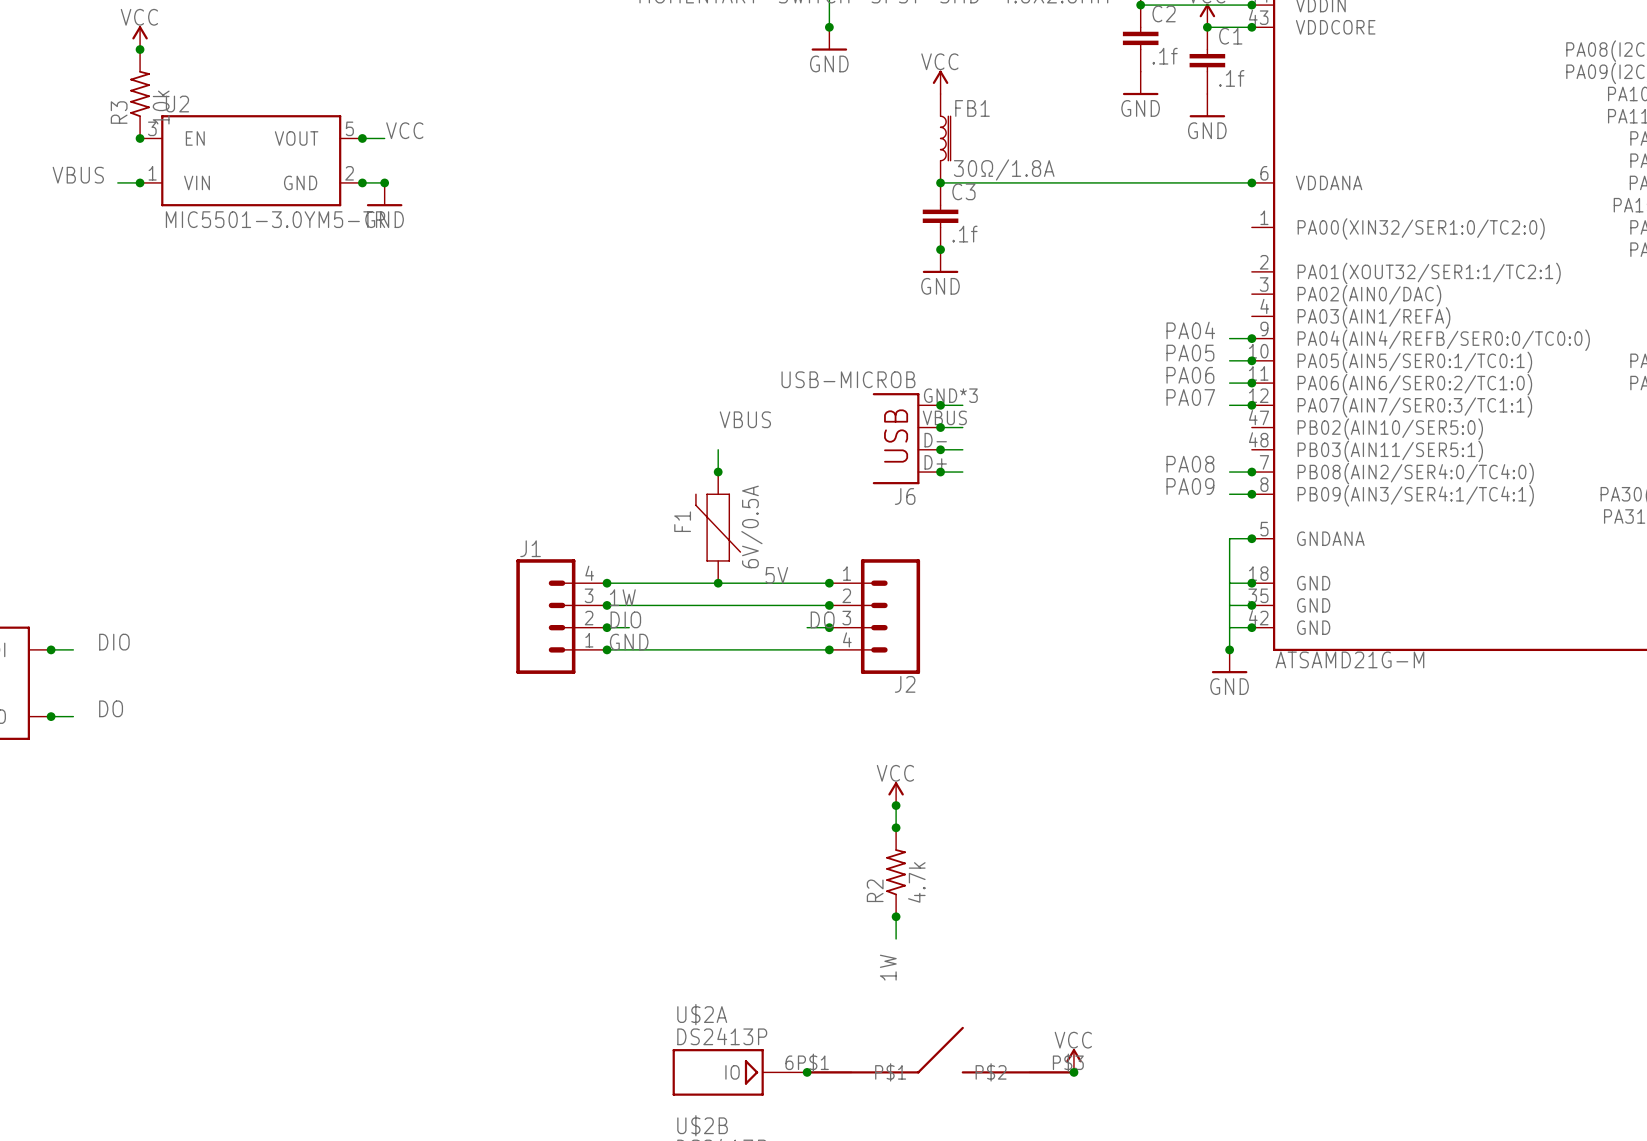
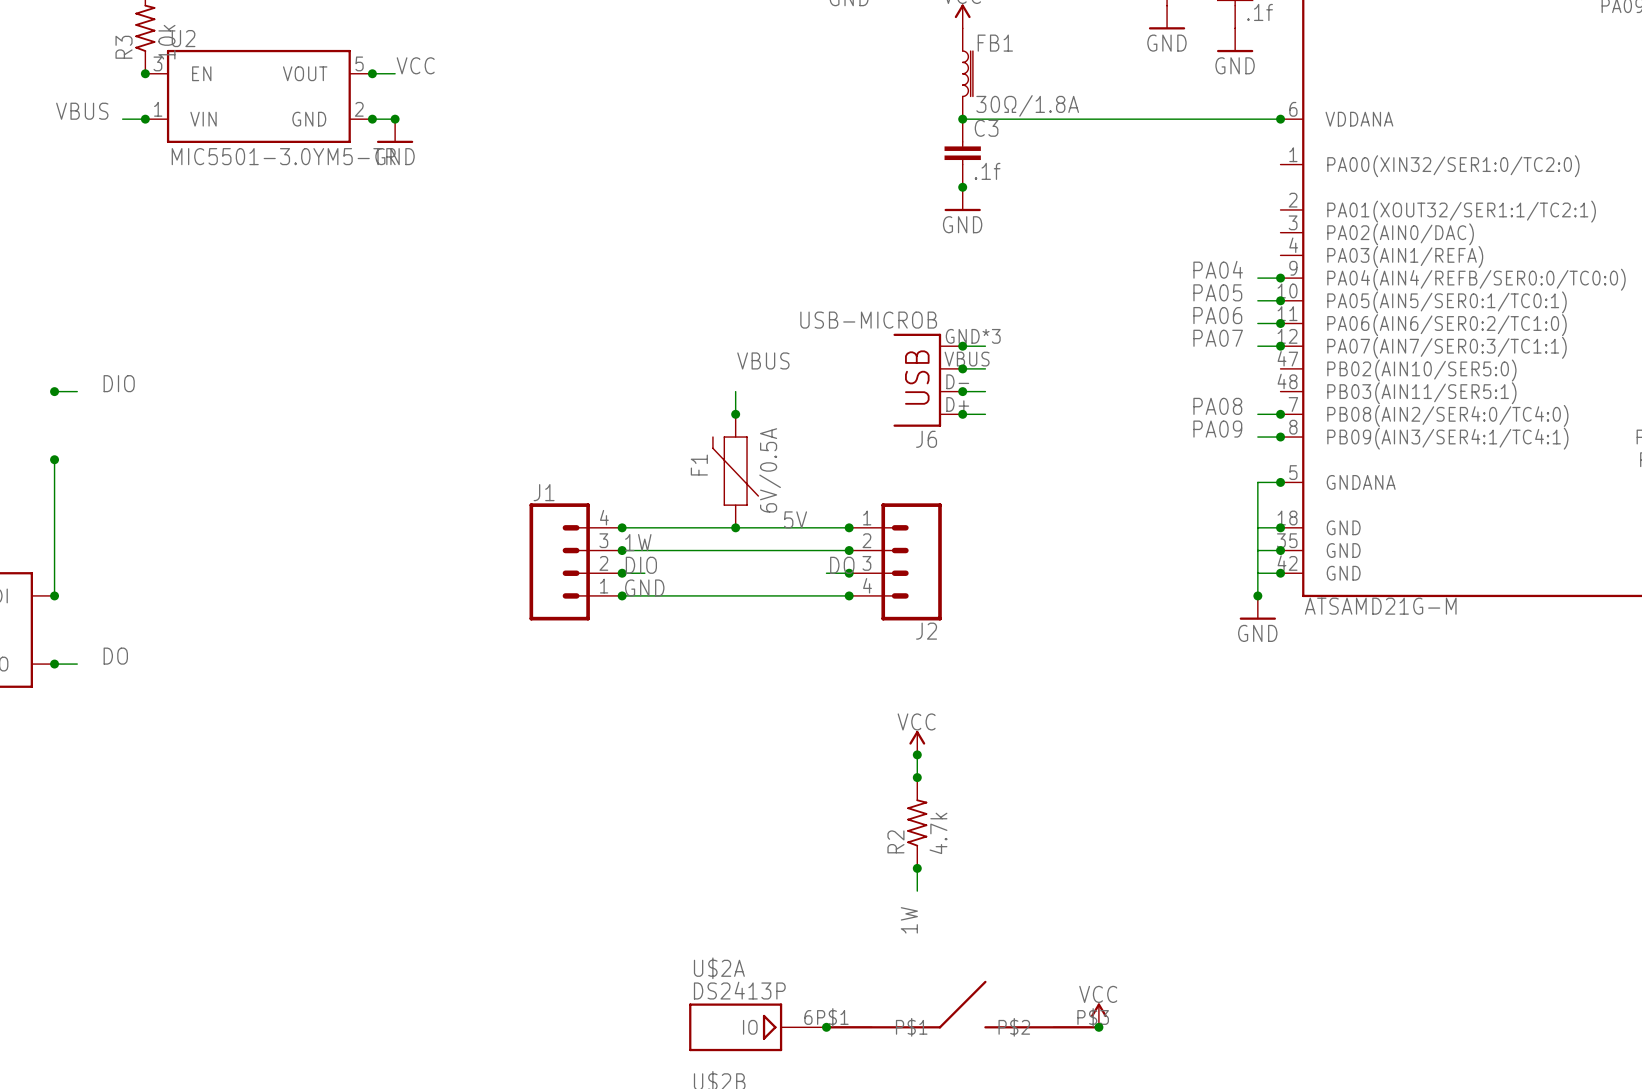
wire: none -> (54, 391) (77, 391)
junction: none -> (54, 391)
junction: none -> (54, 459)
label position: DIO (114, 642) -> DIO (119, 383)
wire: (51, 649) (73, 649) -> (54, 595) (54, 459)

